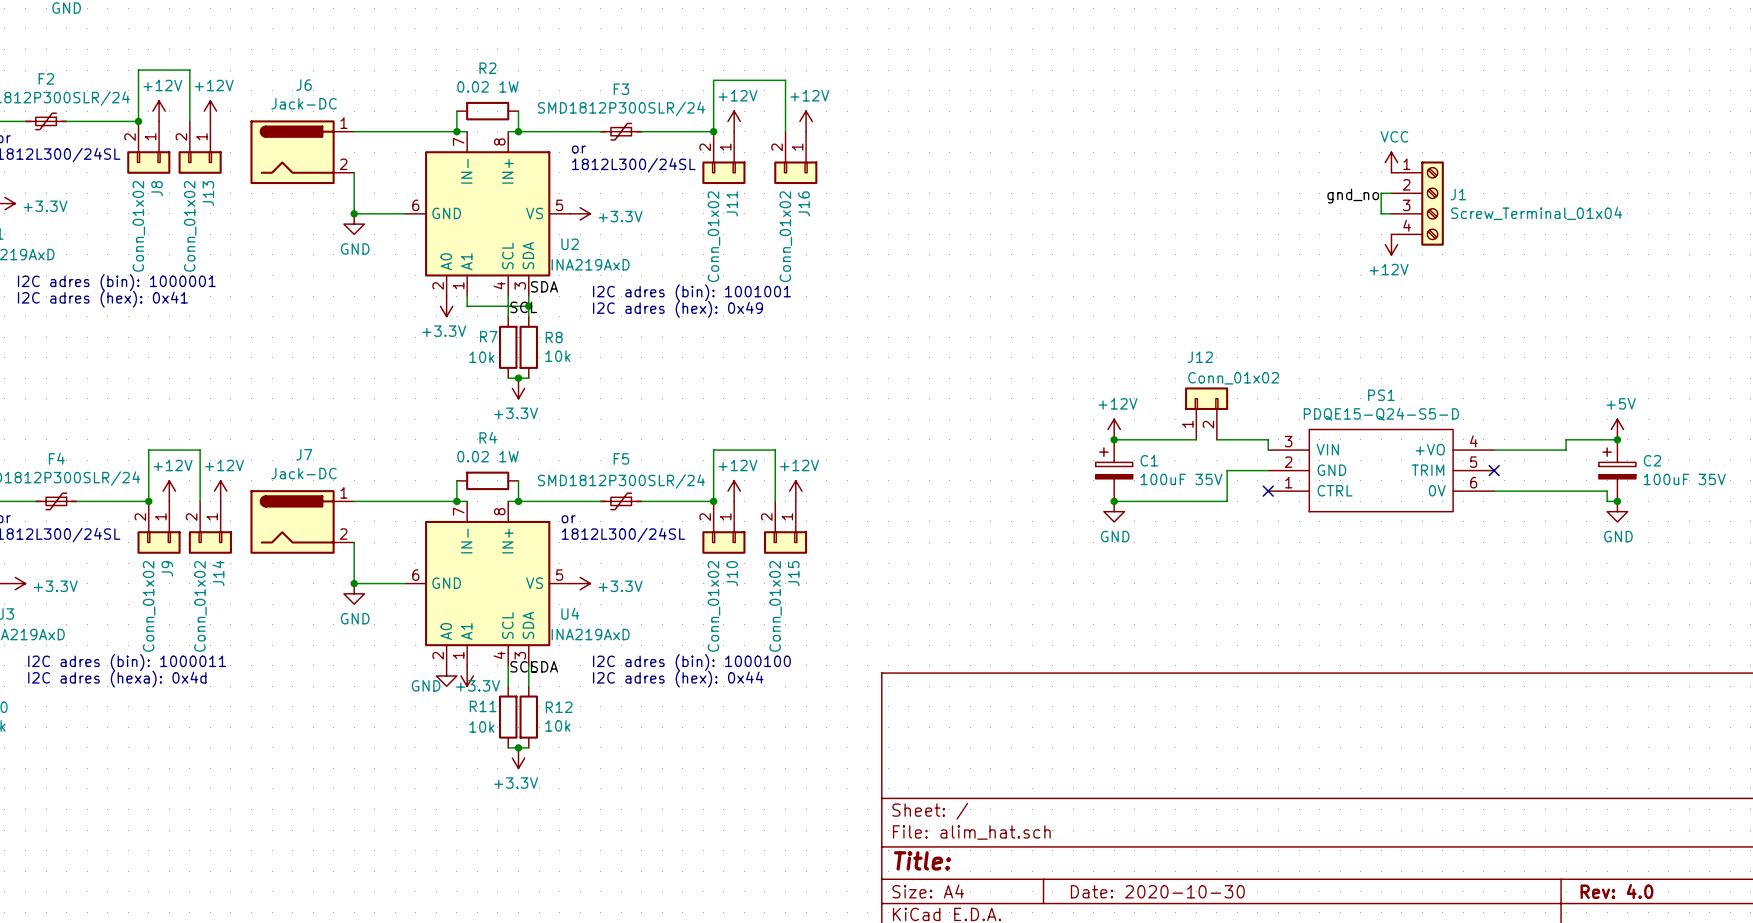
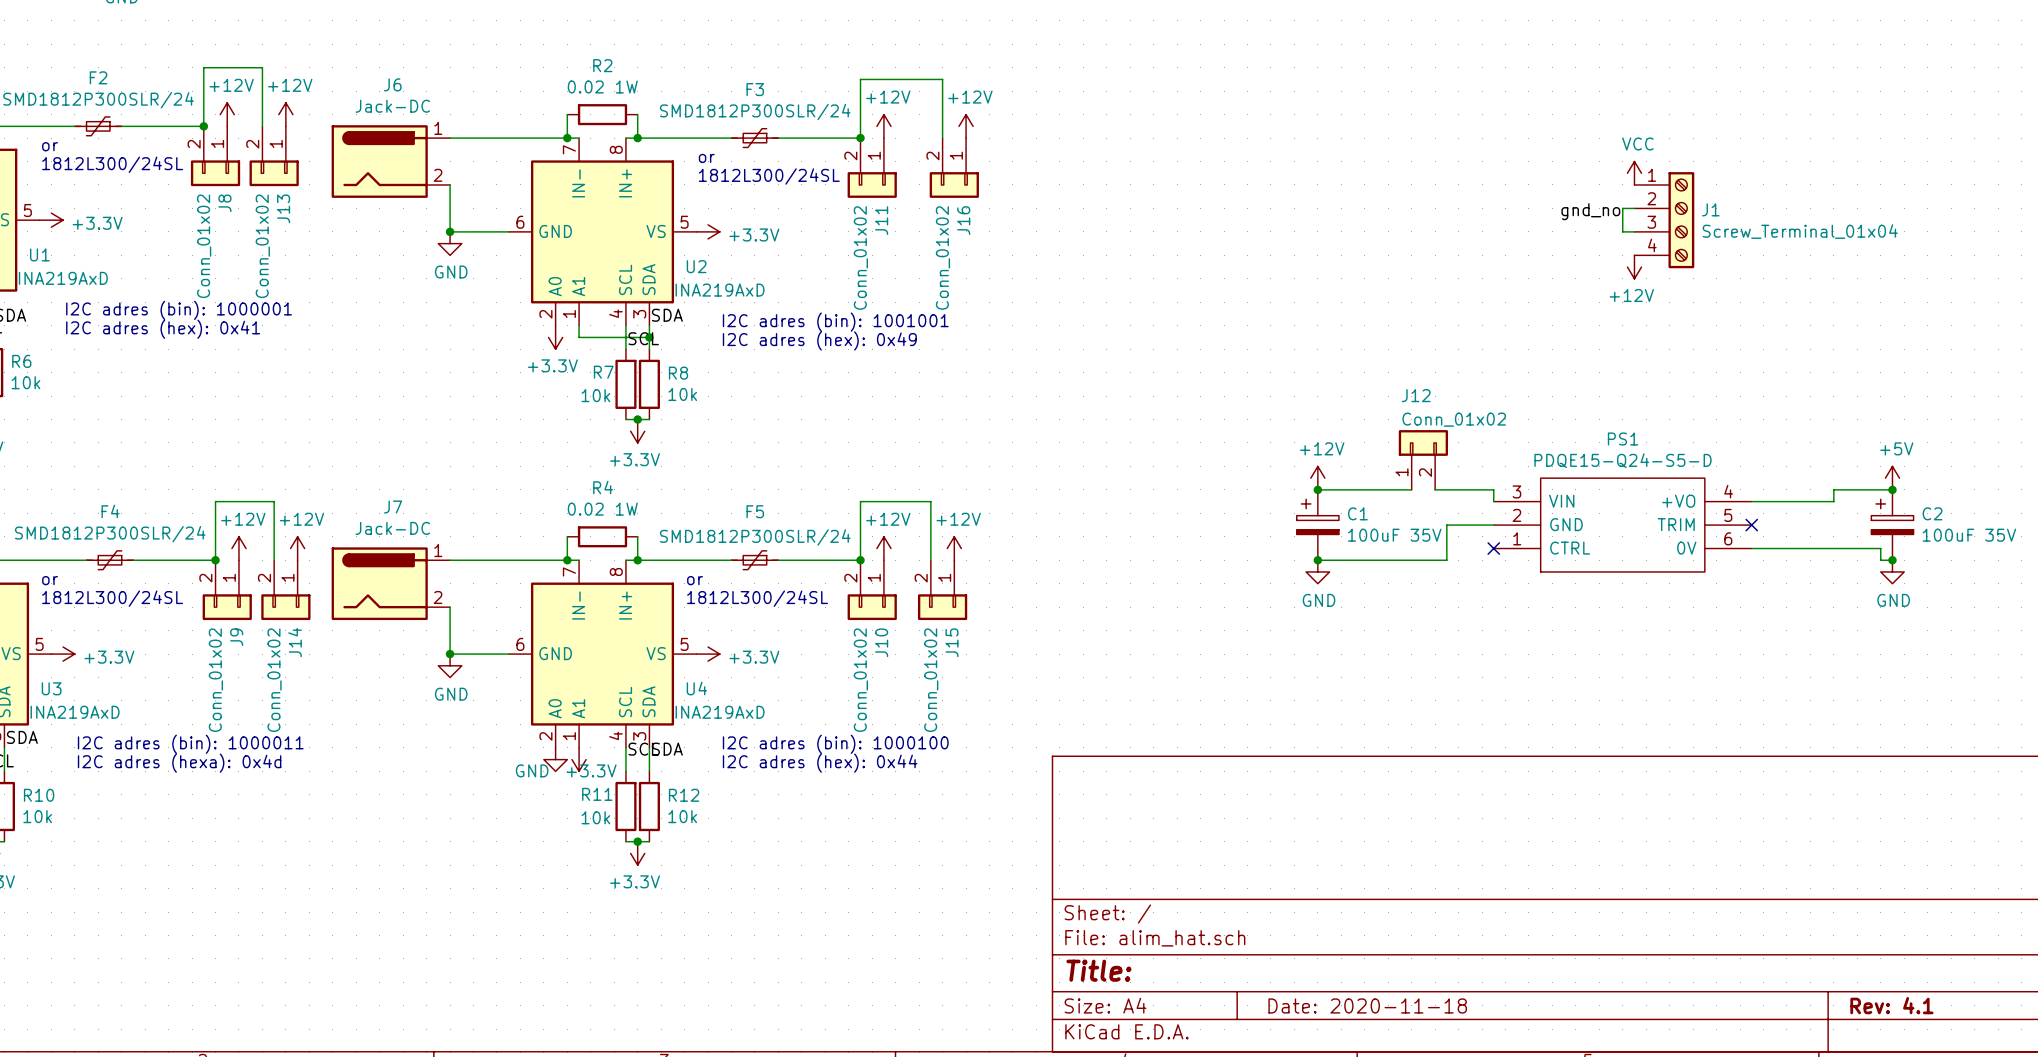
title block: Date: 2020-10-30 (1157, 891) -> Date: 2020-11-18 (1367, 1005)
title block: Rev: 4.0 (1616, 891) -> Rev: 4.1 (1891, 1005)

